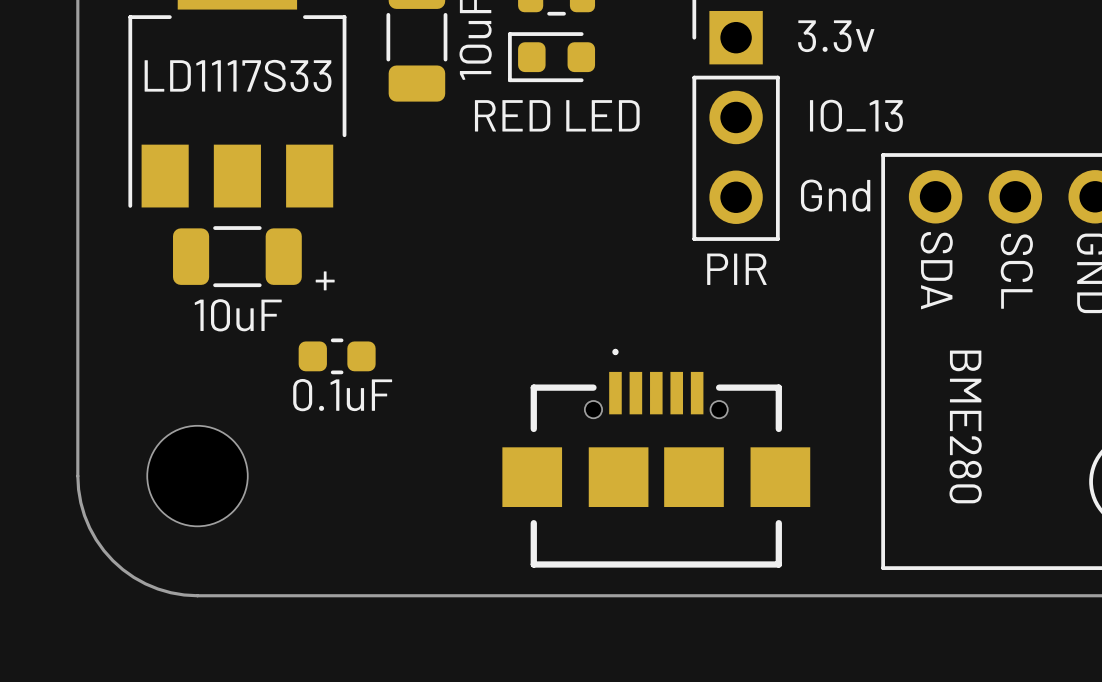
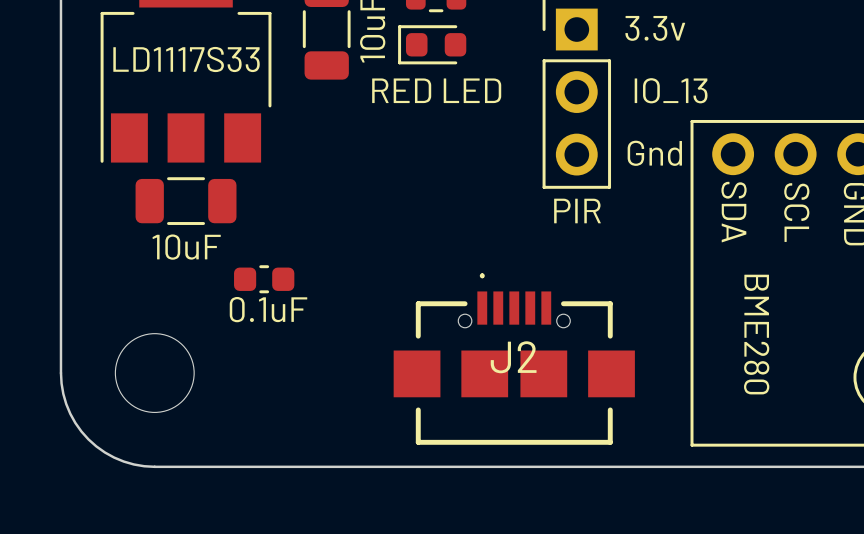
text: + (325, 280) -> none
J2 name: none -> J2 (513, 357)

